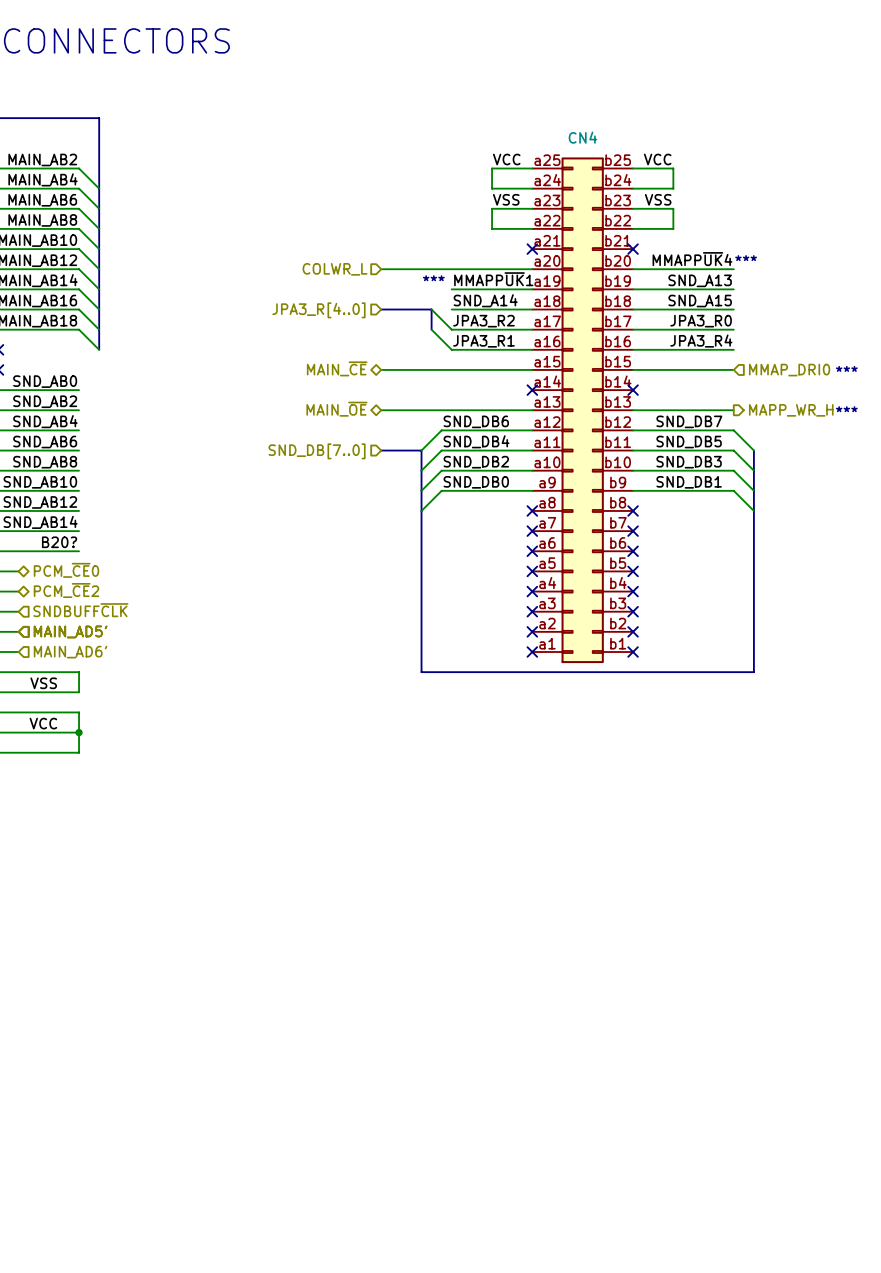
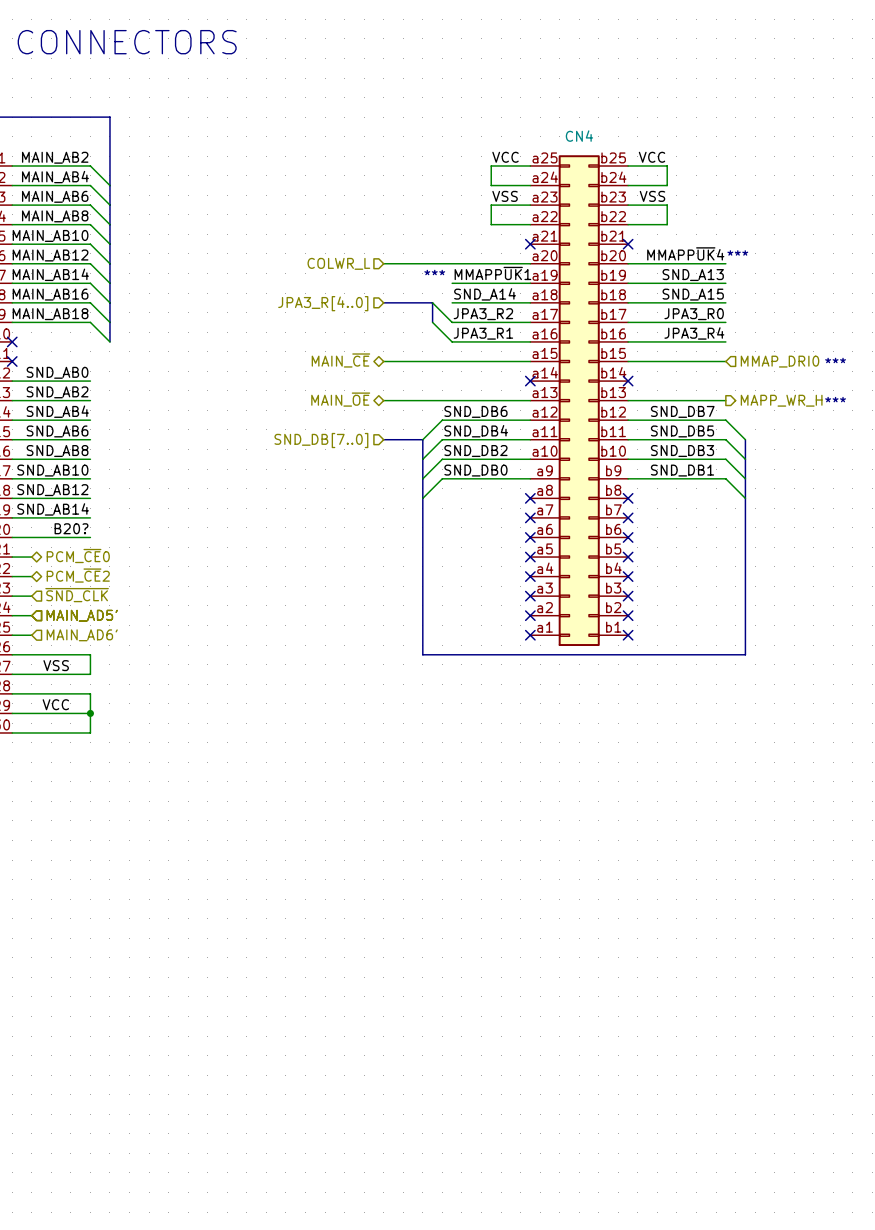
hierarchical label: SNDBUFF~{CLK} (80, 610) -> ~{SND_CLK} (77, 595)

